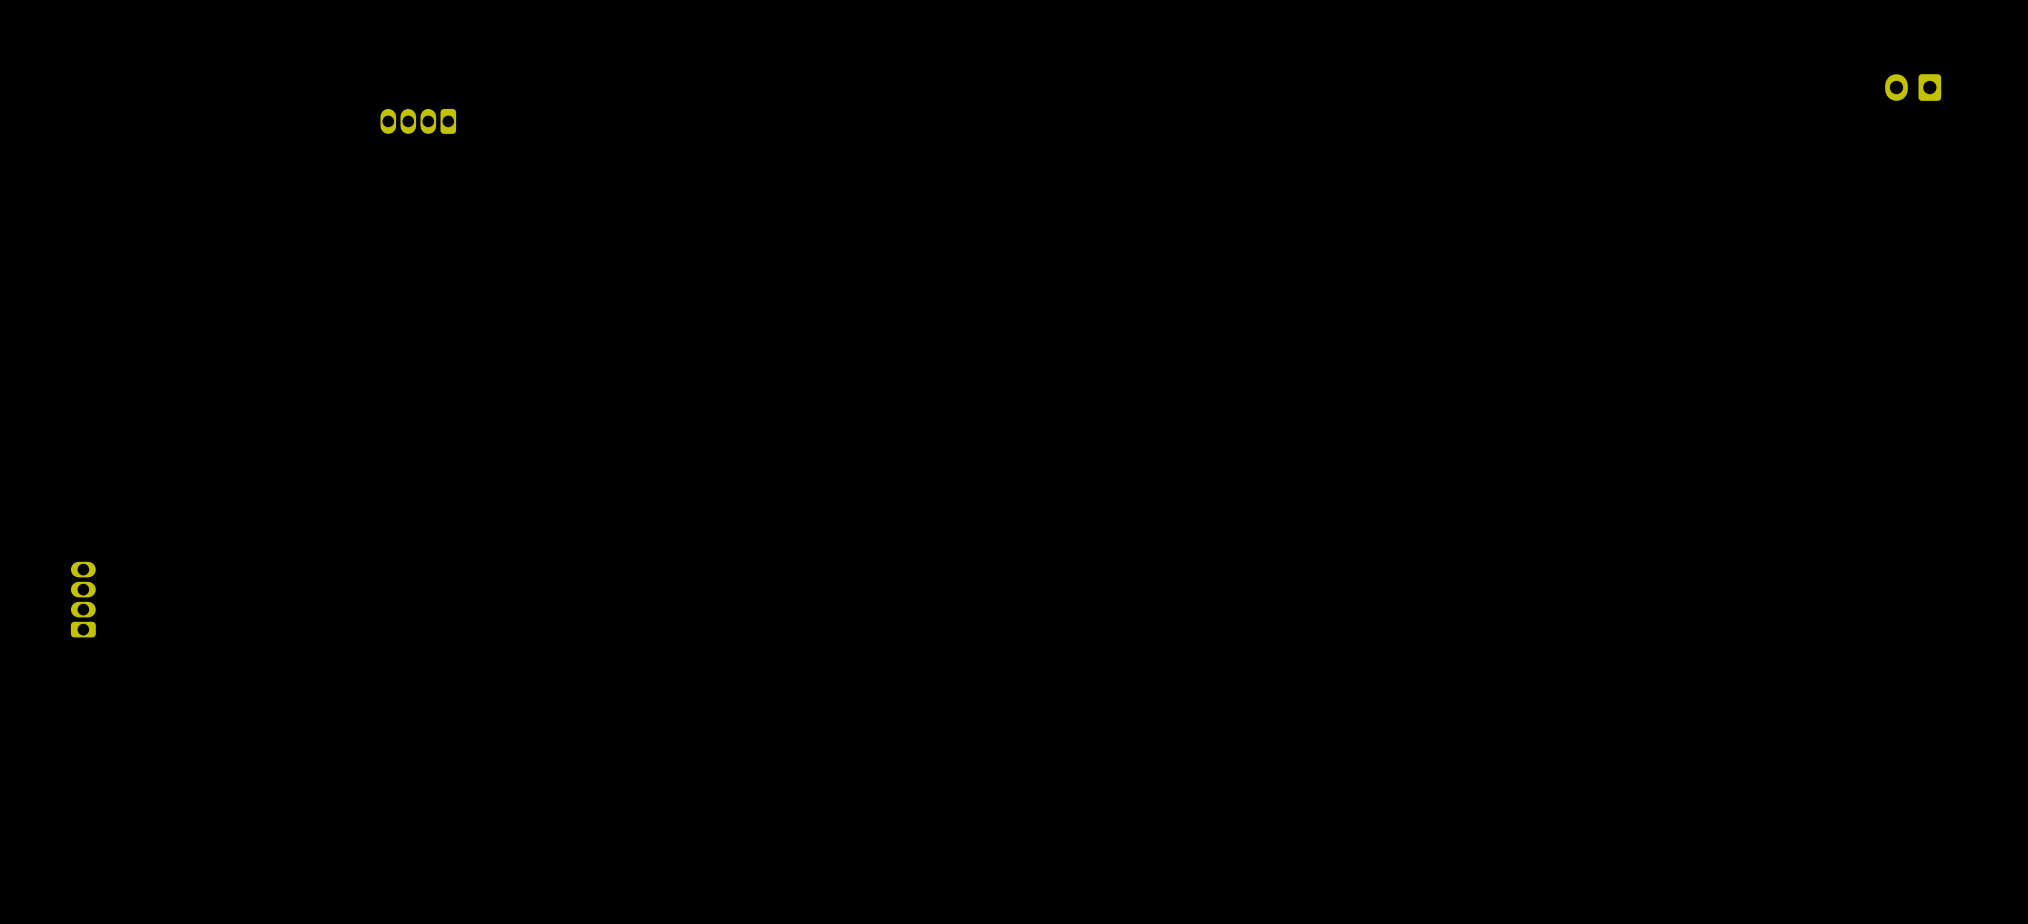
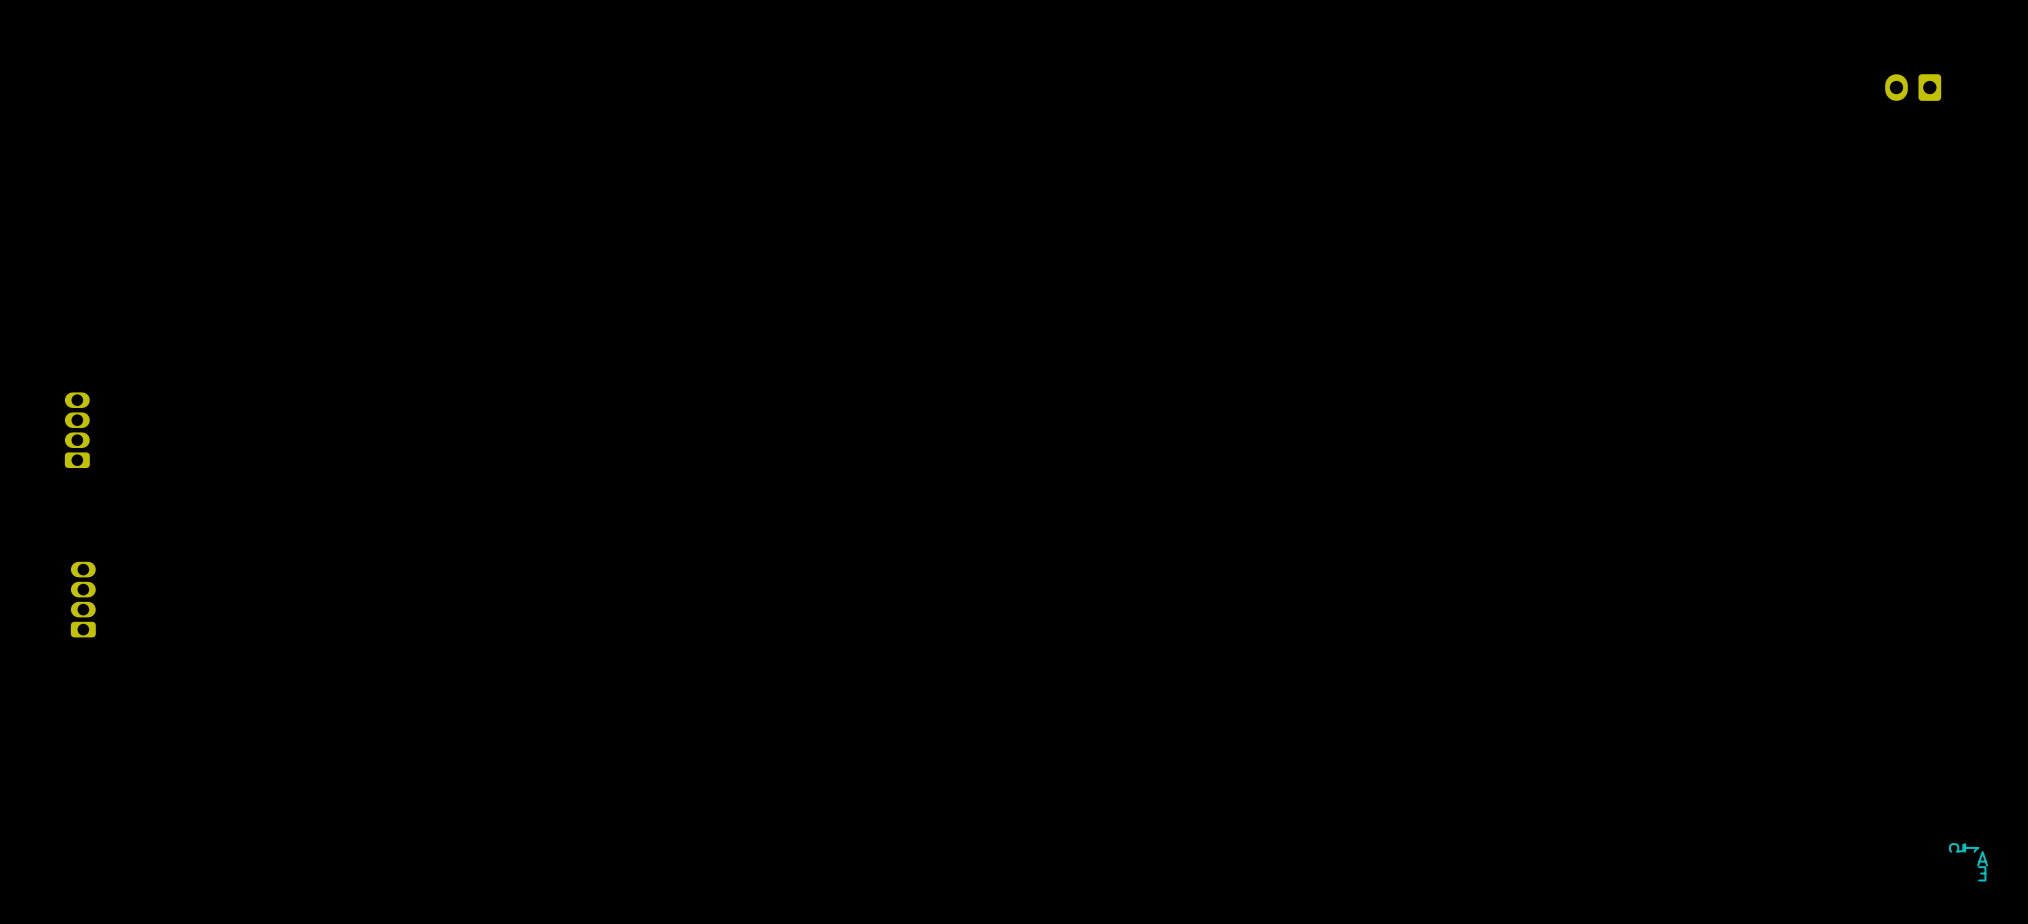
part: (418, 121) -> none
part: none -> (77, 430)
part: none -> (1968, 862)

